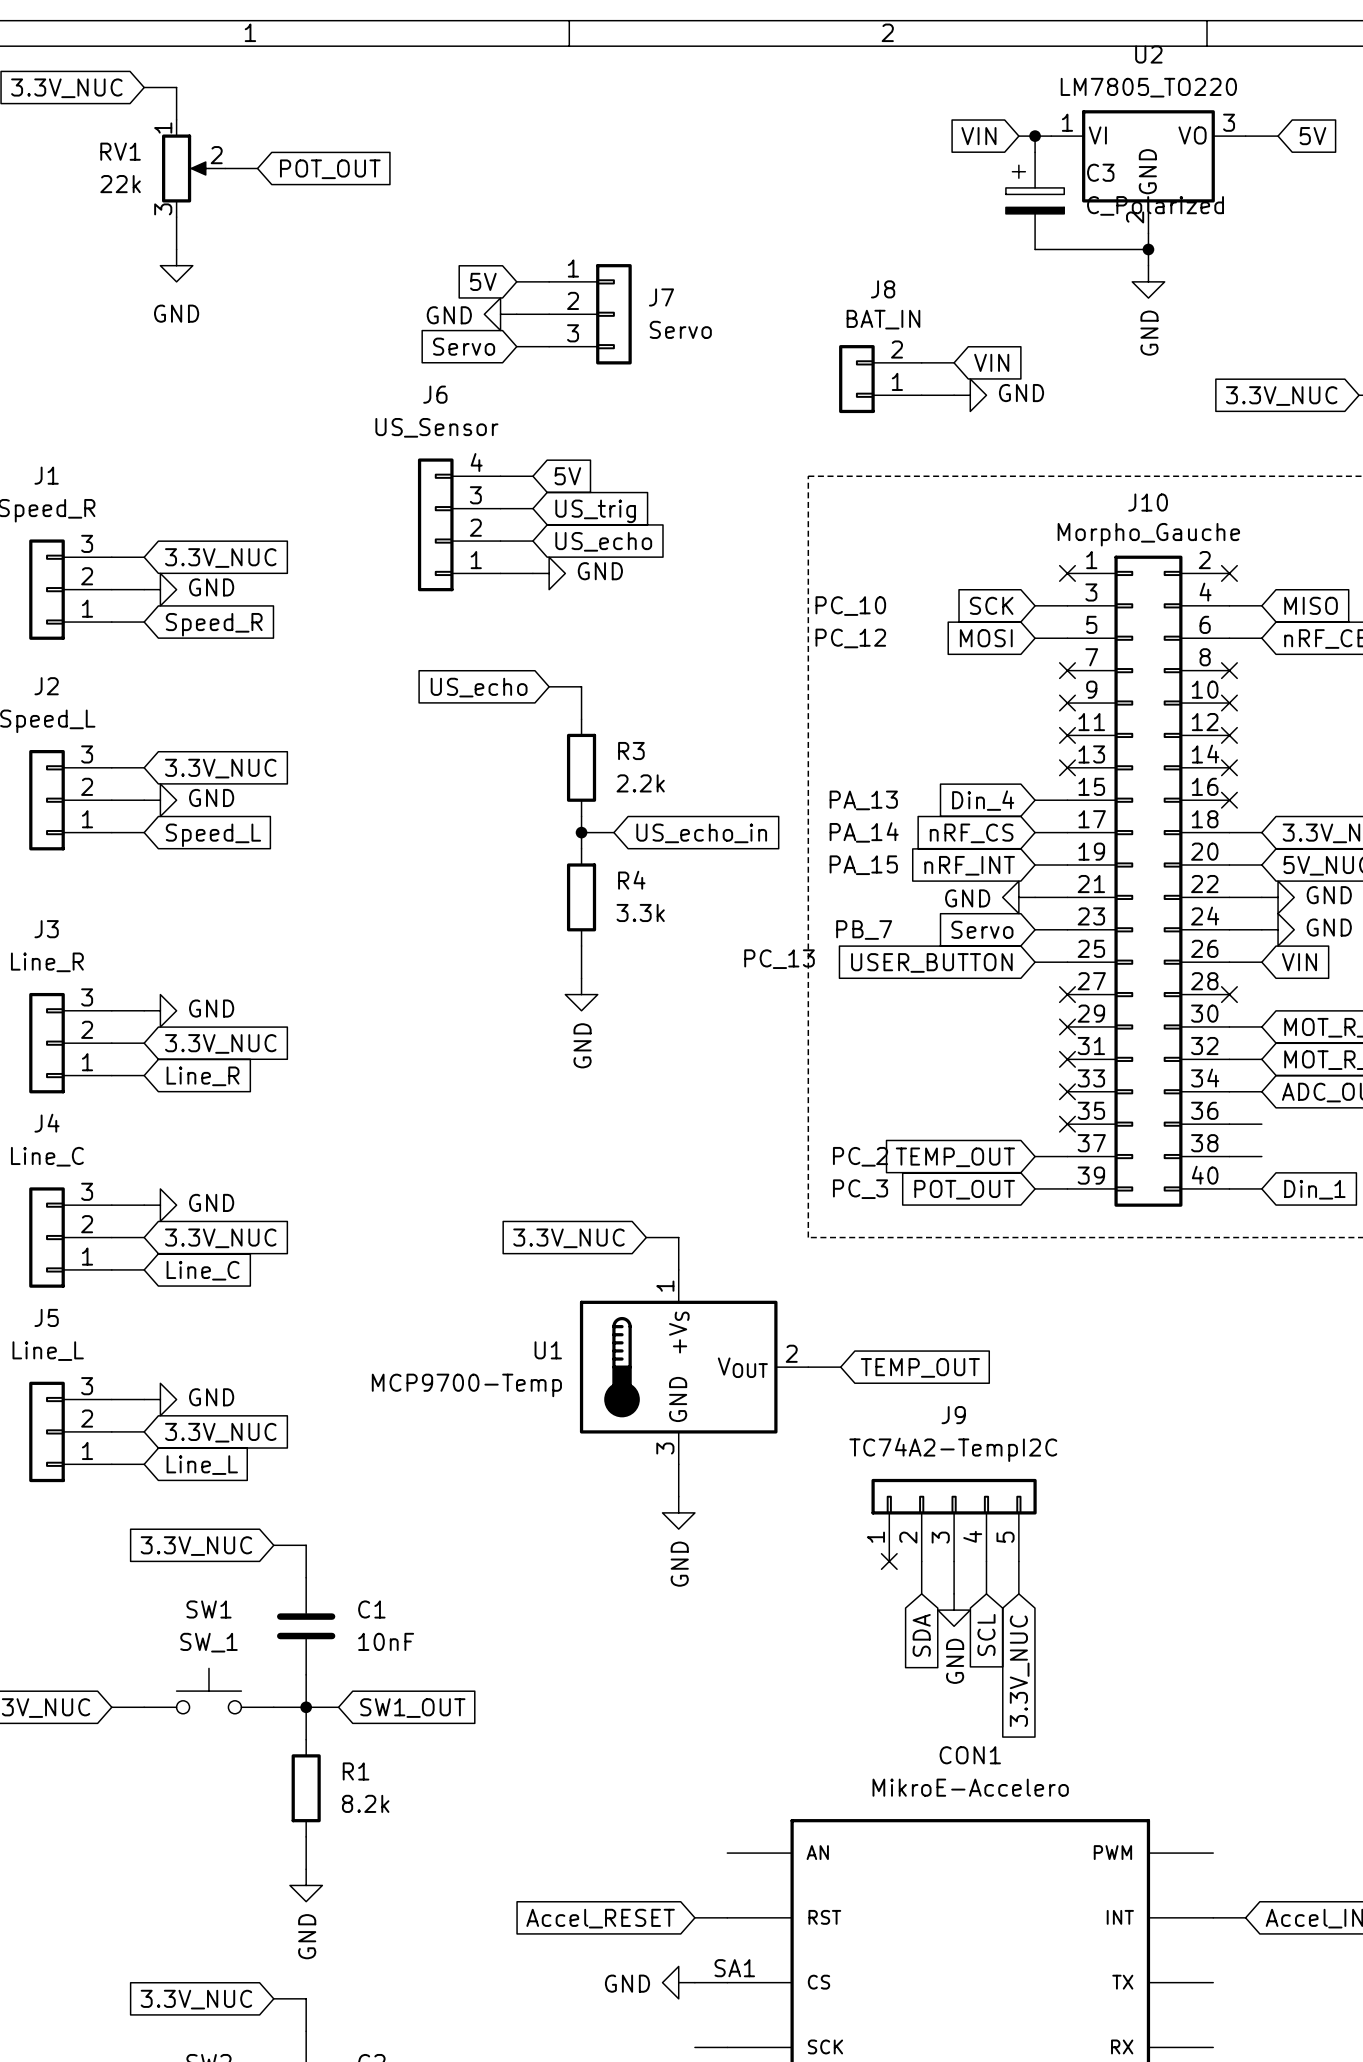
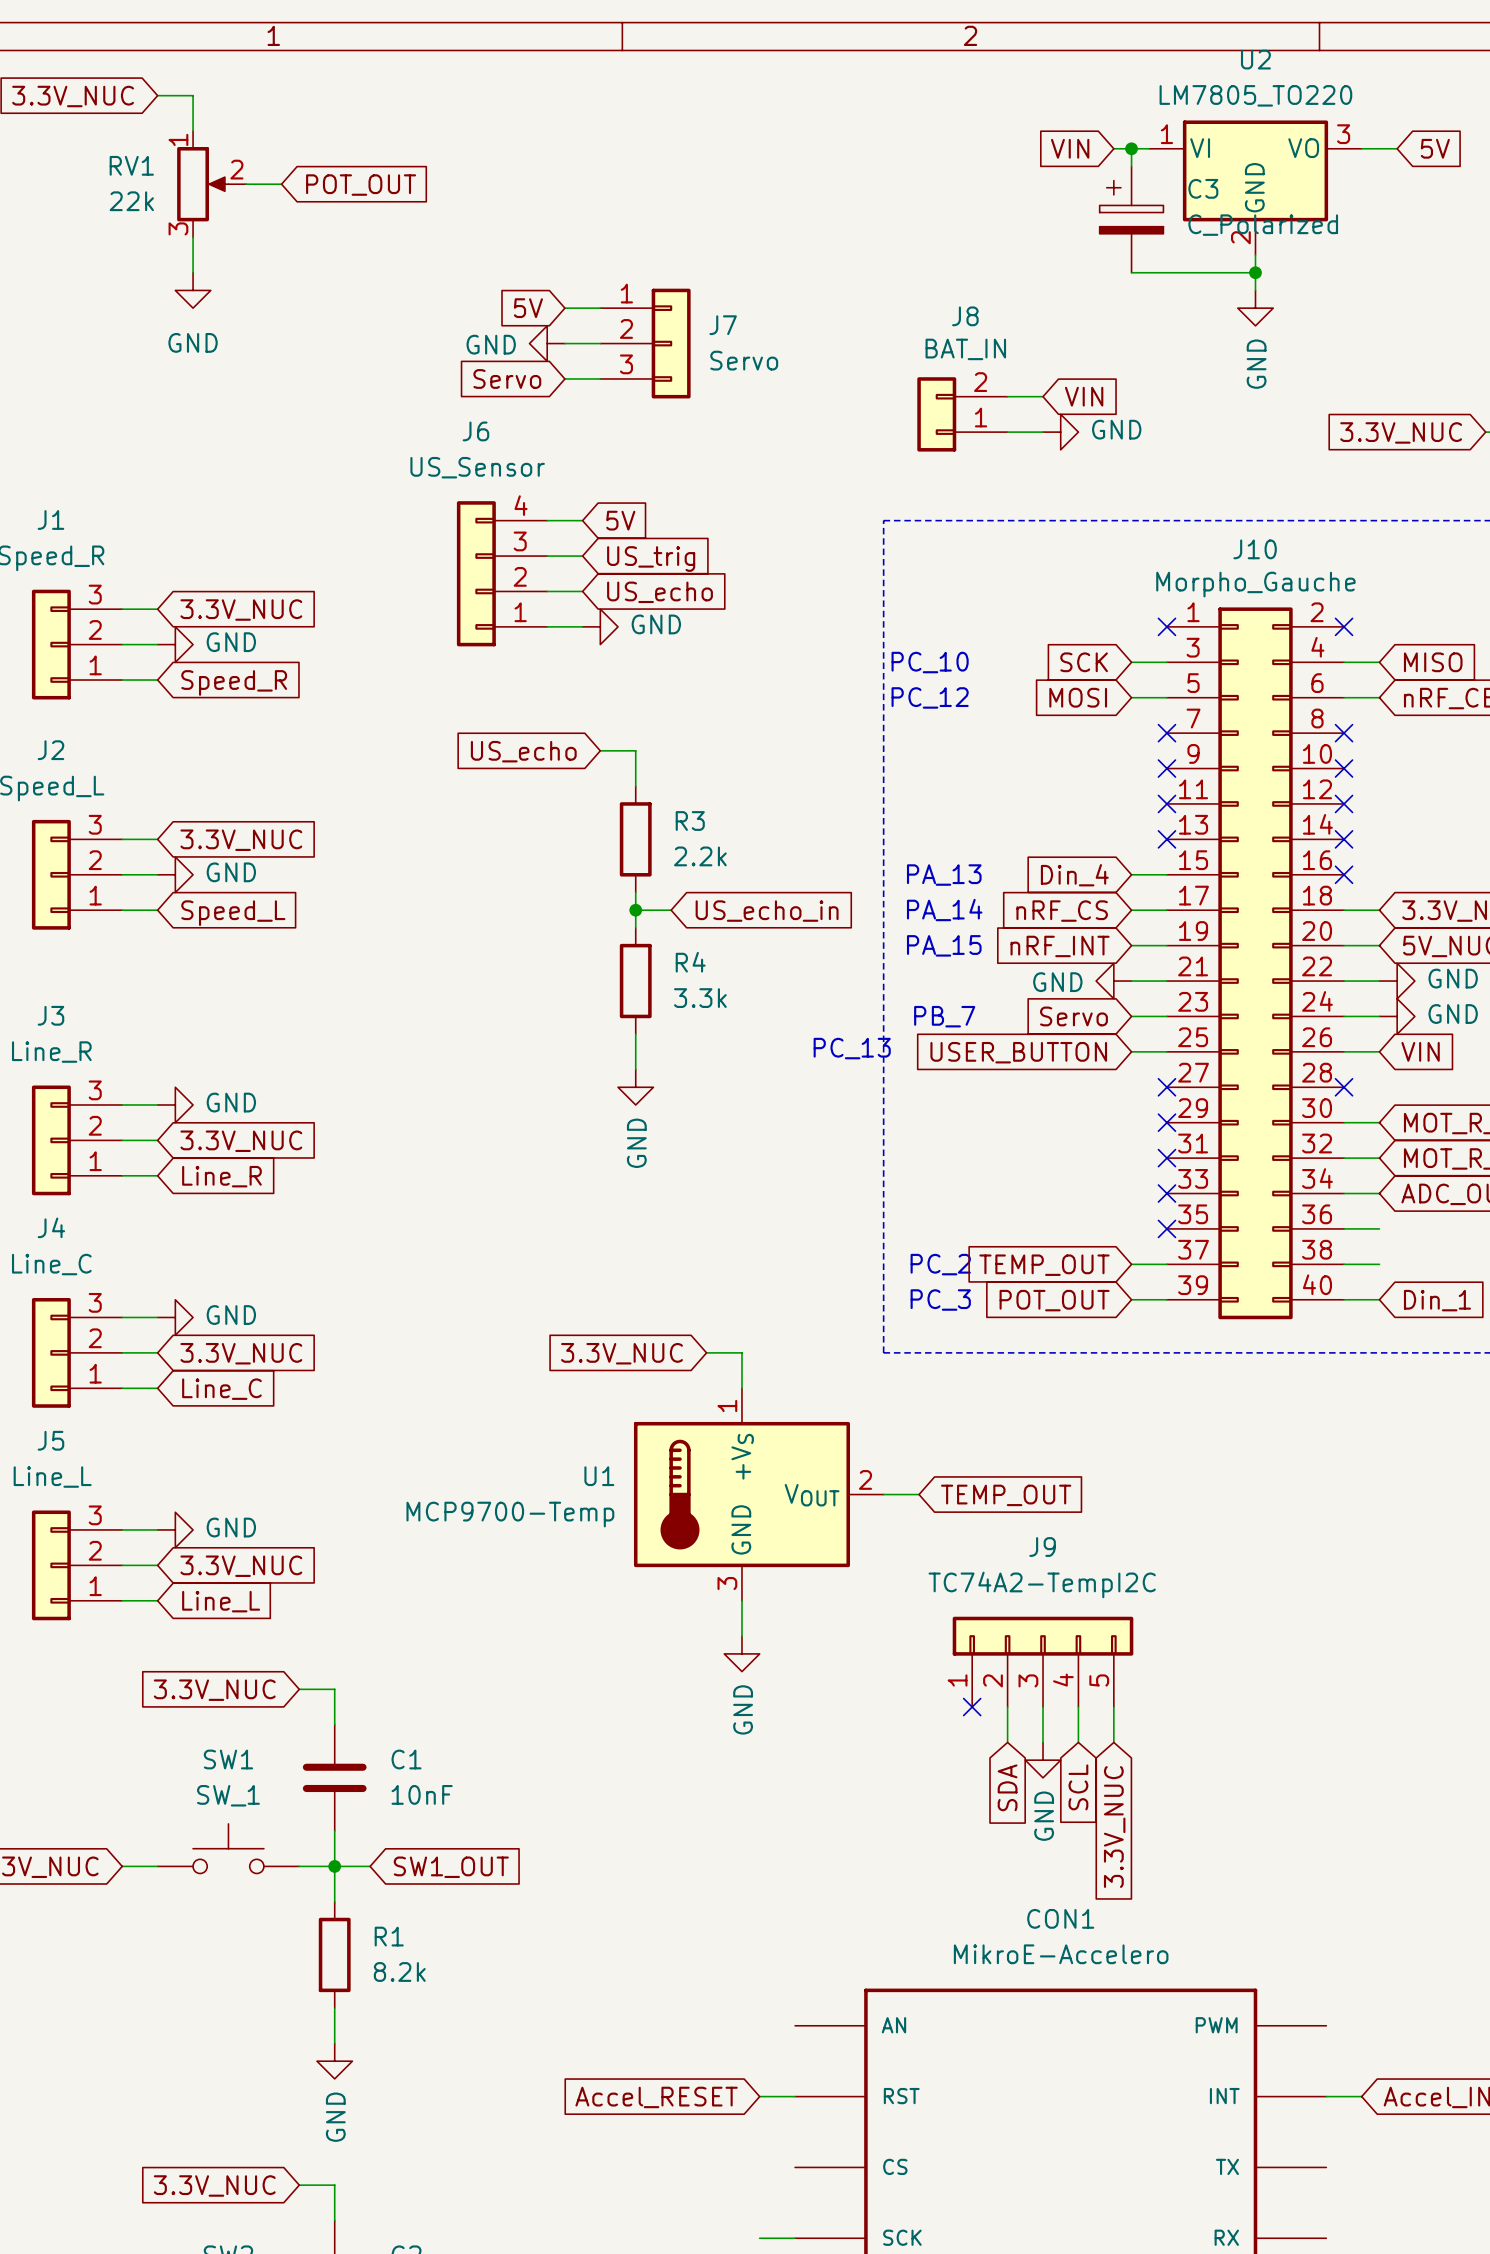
label: SA1 (734, 1968) -> none
power symbol: GND (678, 1982) -> none
wire: (694, 1982) (727, 1982) -> none

